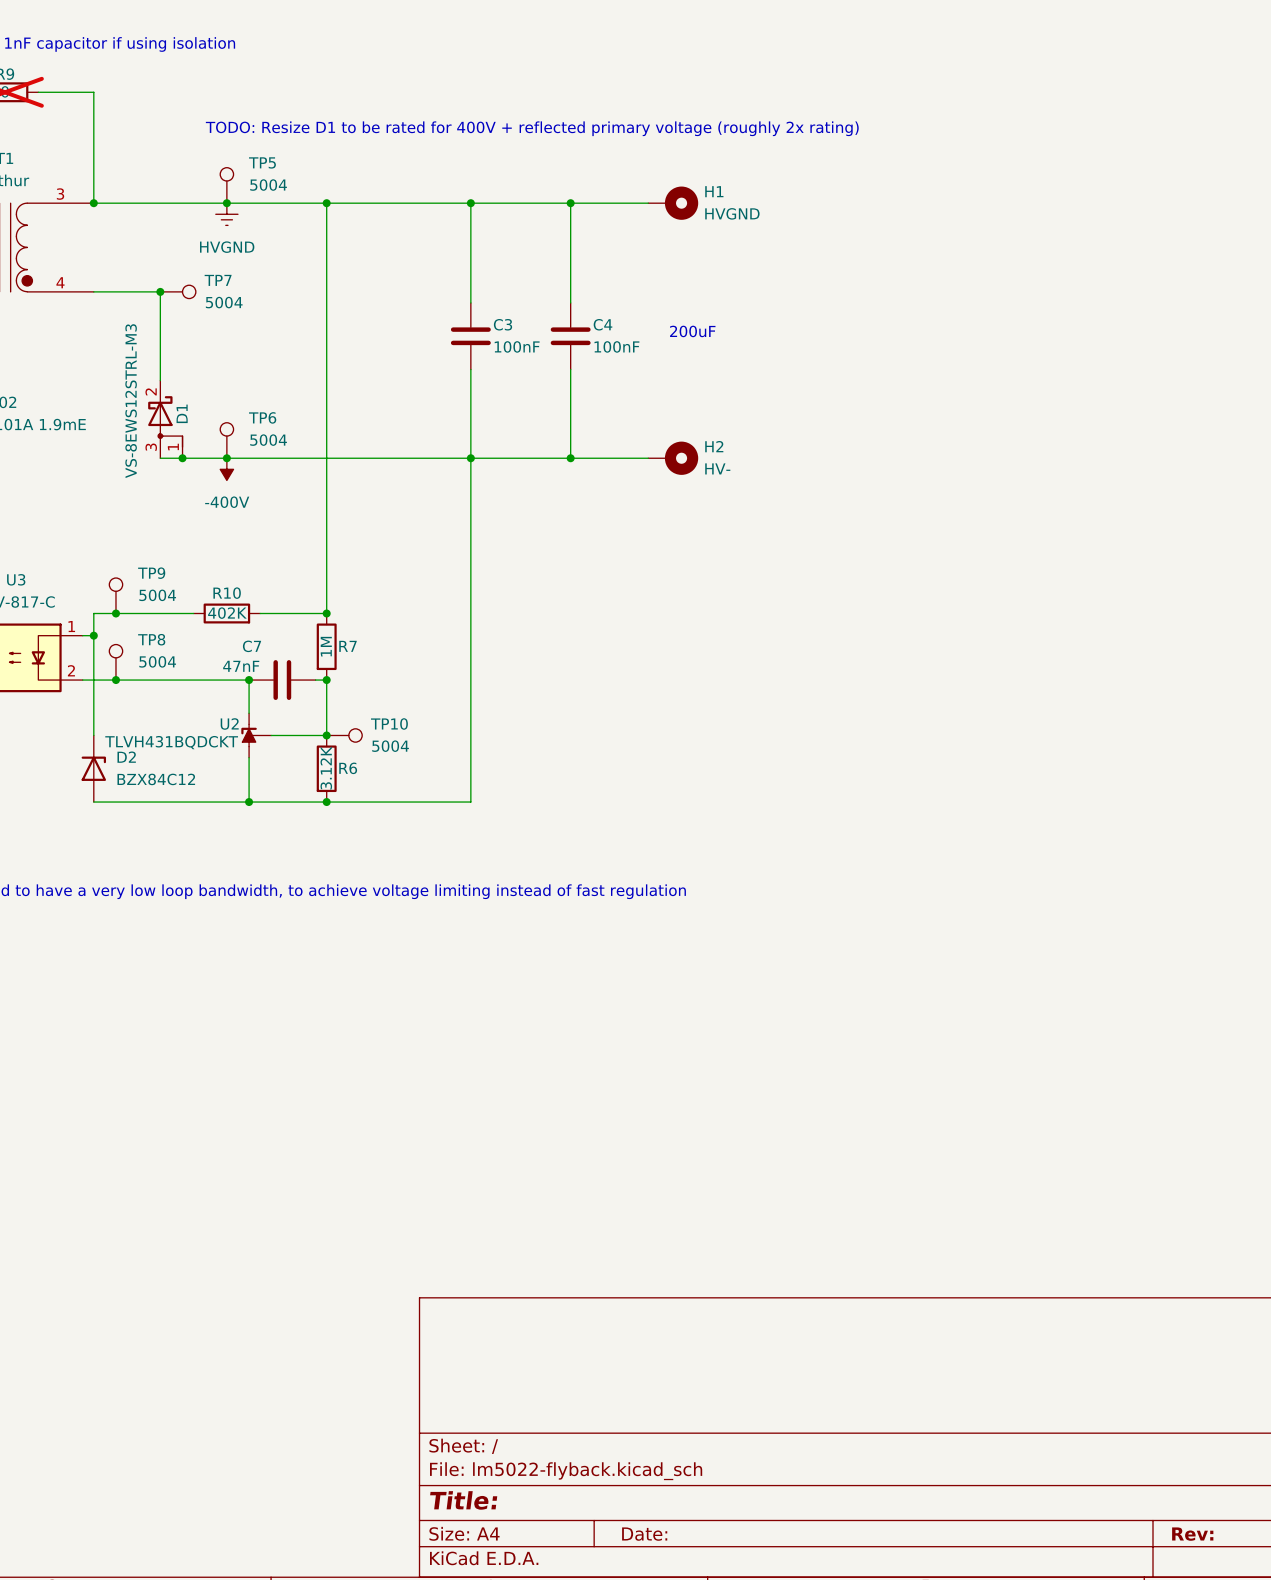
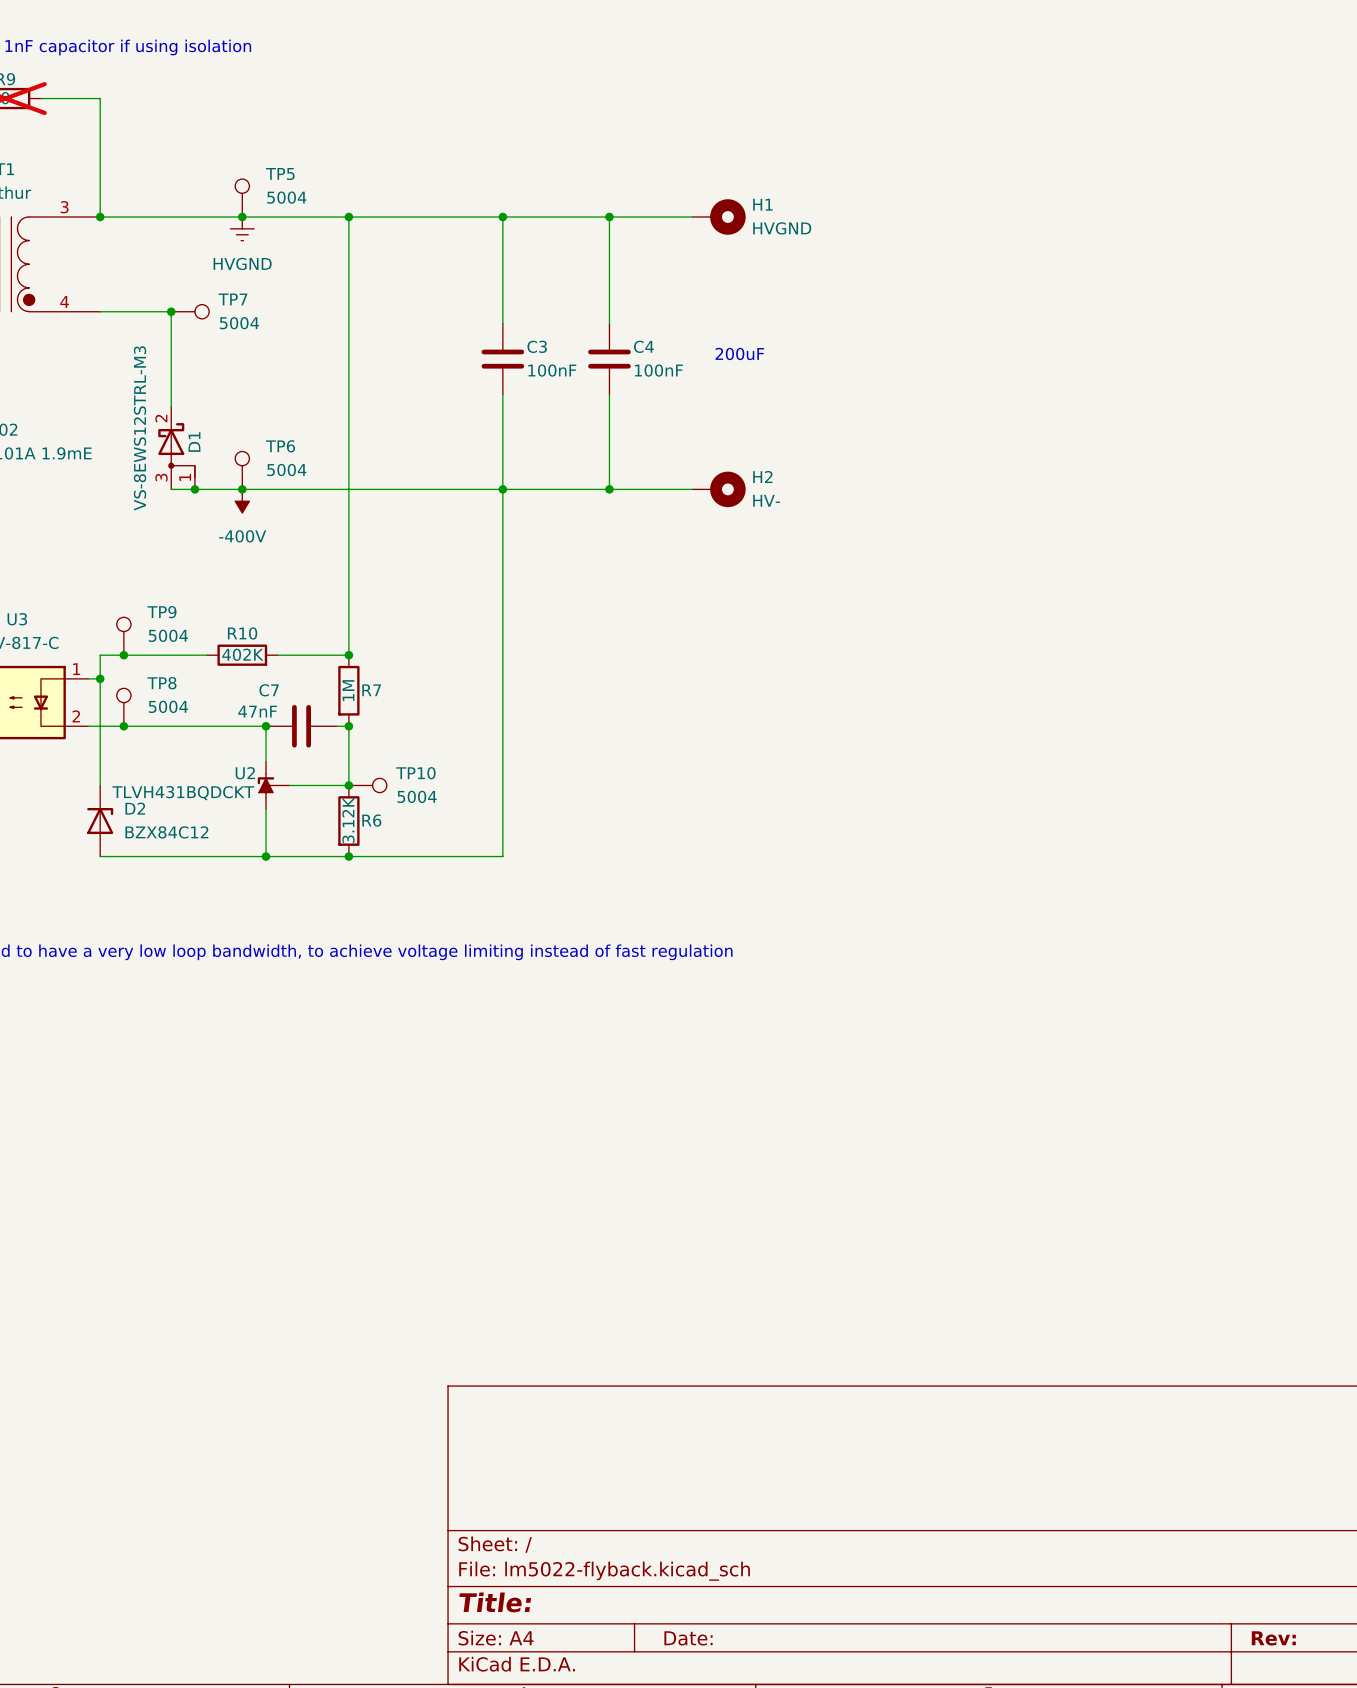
text: TODO: Resize D1 to be rated for 400V + reflected primary voltage (roughly 2x rating) (532, 128) -> none

